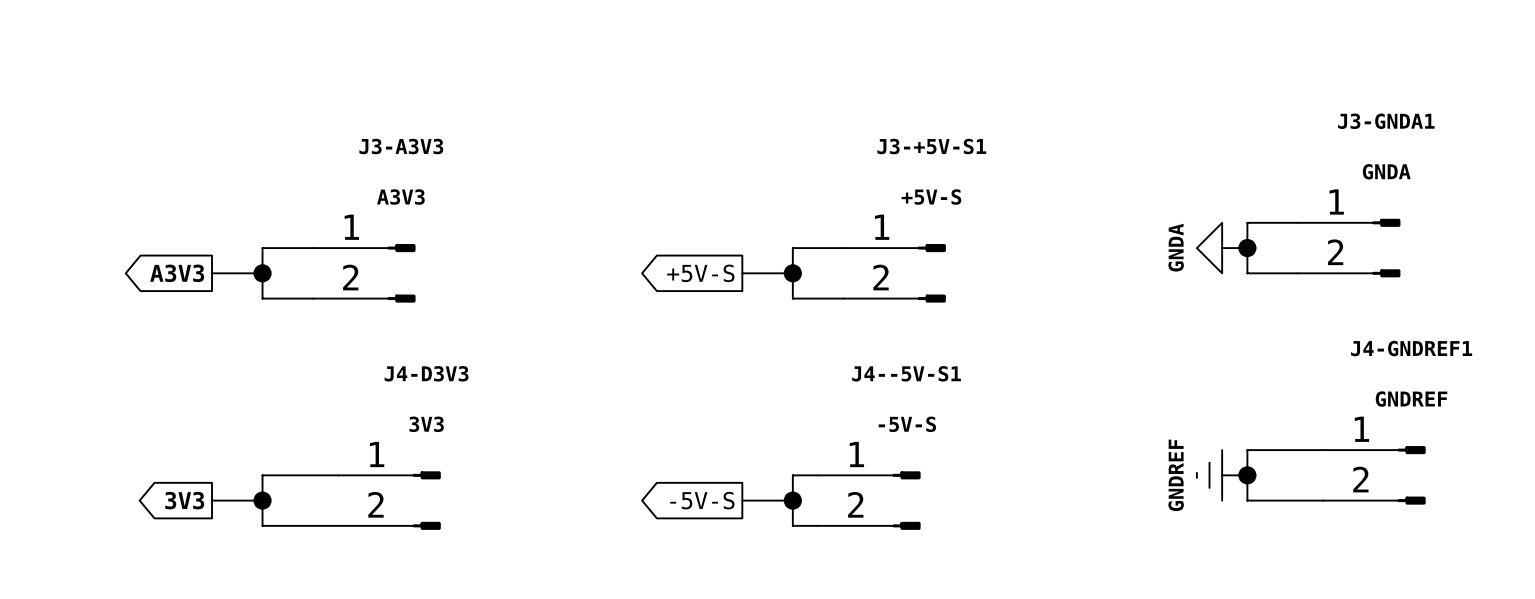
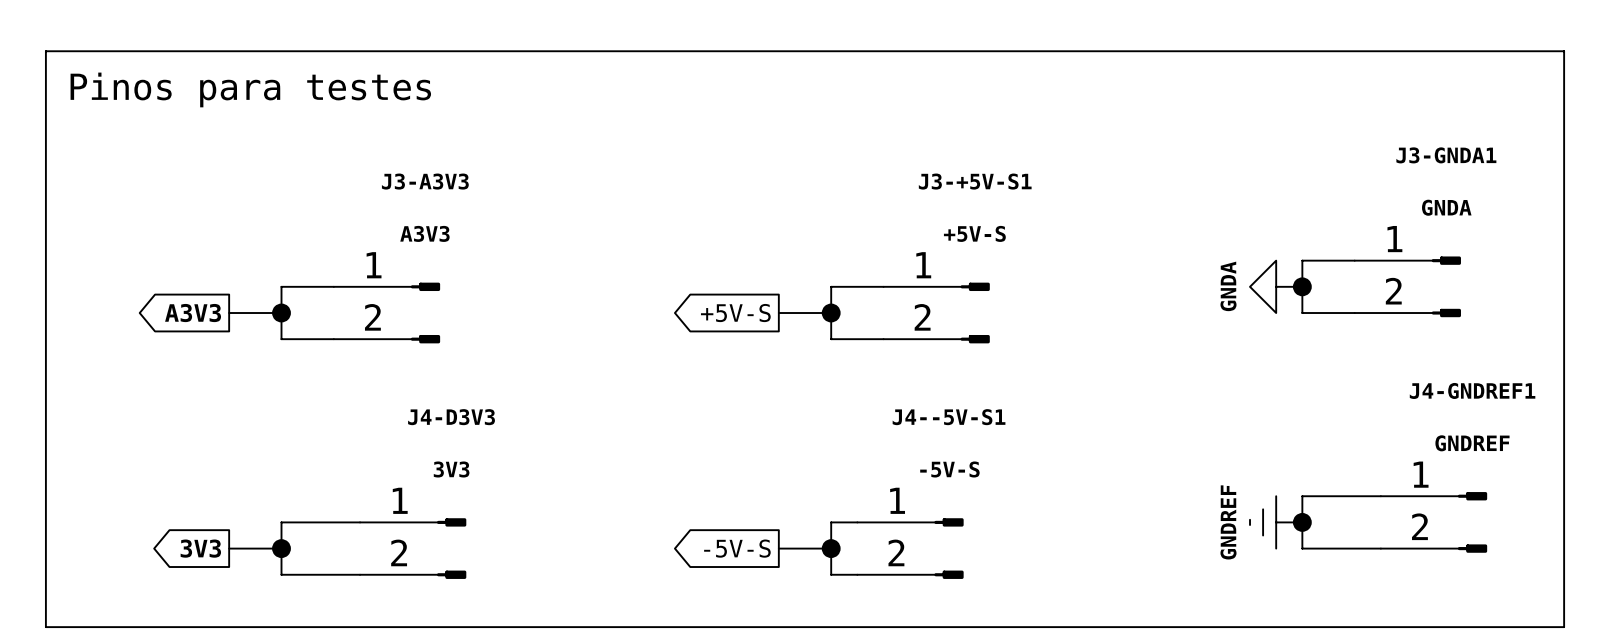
line: none -> (45, 51) (1564, 51) (1564, 627) (45, 627) (45, 51)
text: none -> Pinos para testes (250, 89)

